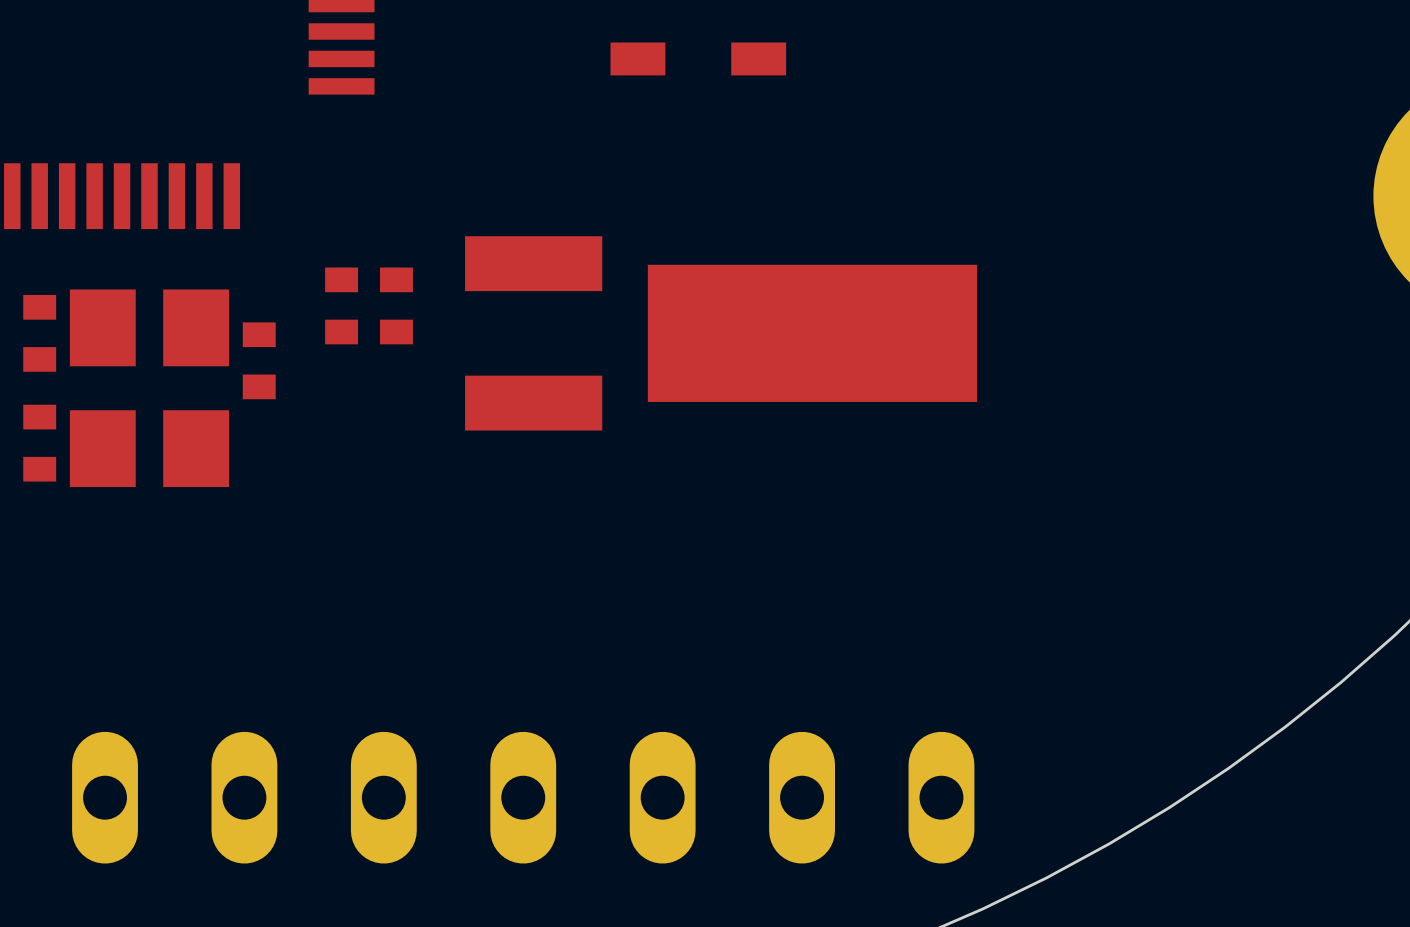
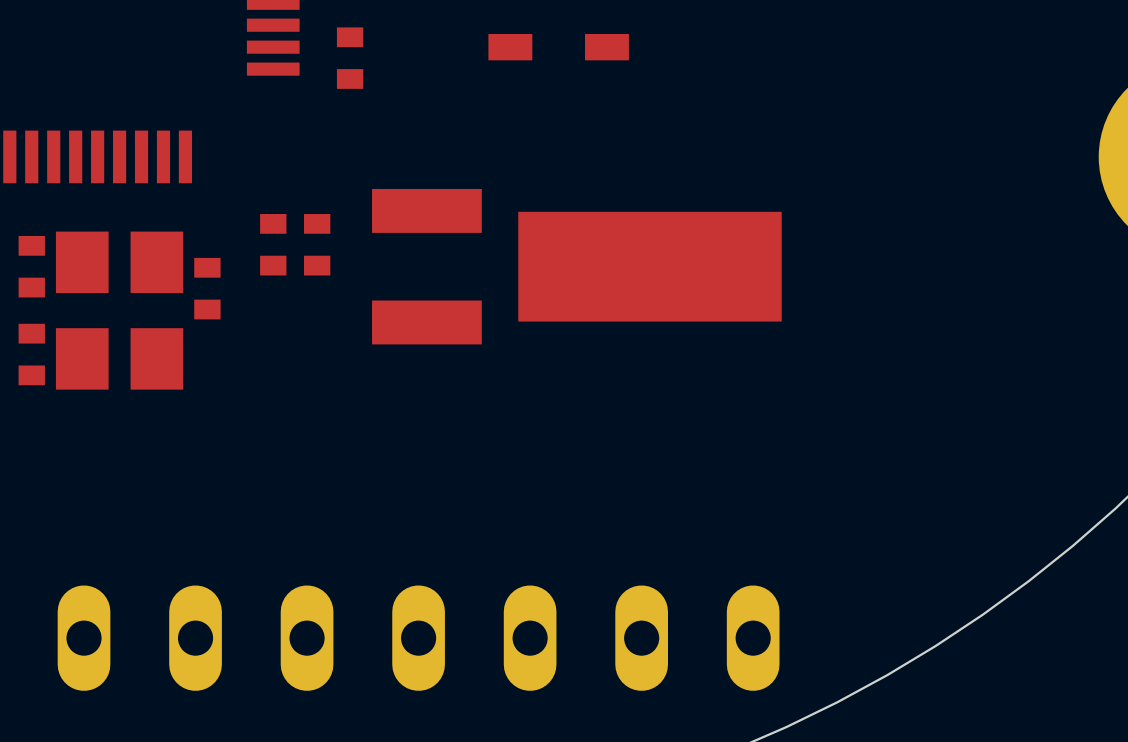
part: none -> (350, 58)

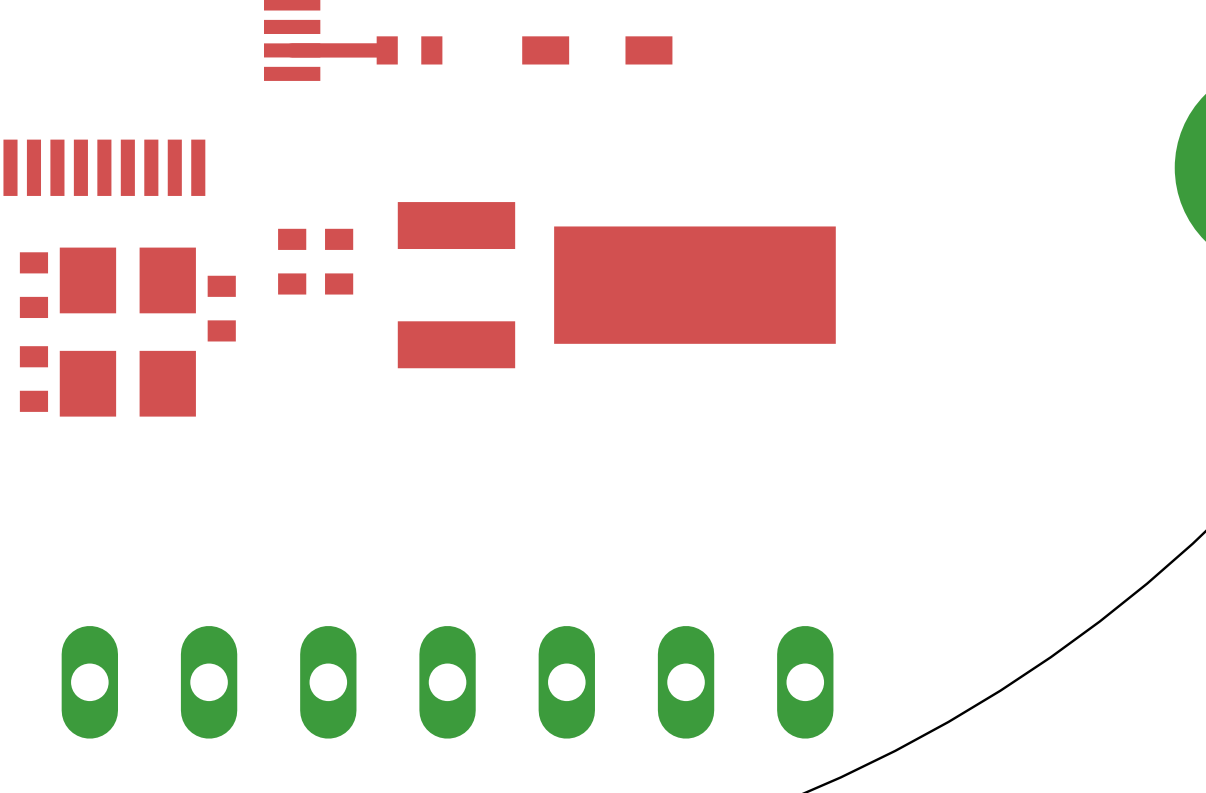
top track: none -> (387, 50) (292, 50)
part rotation: 0° (350, 58) -> 90° clockwise (409, 50)

